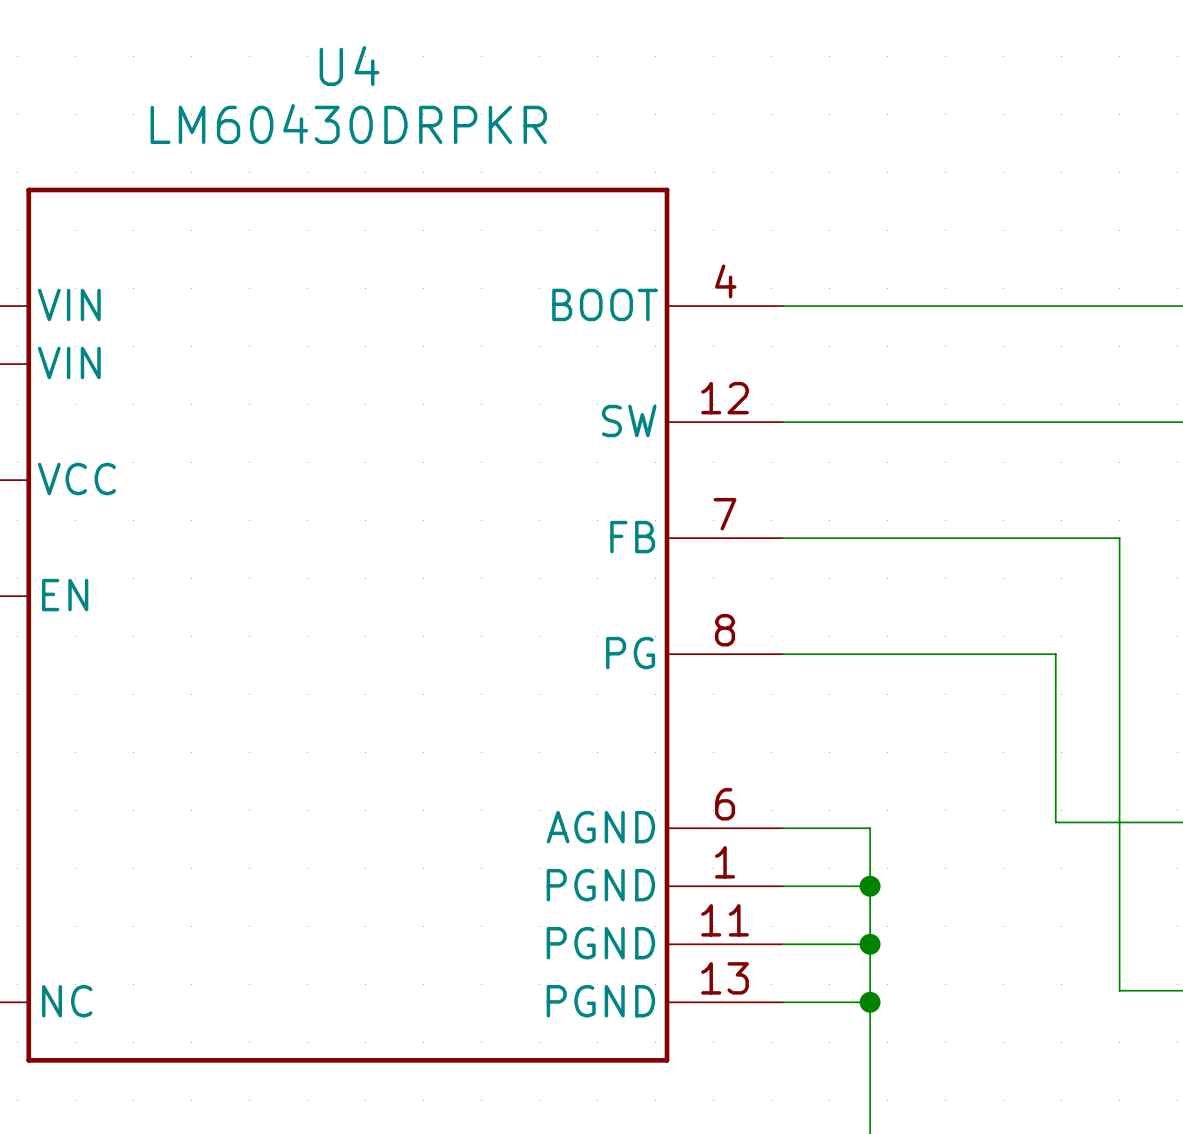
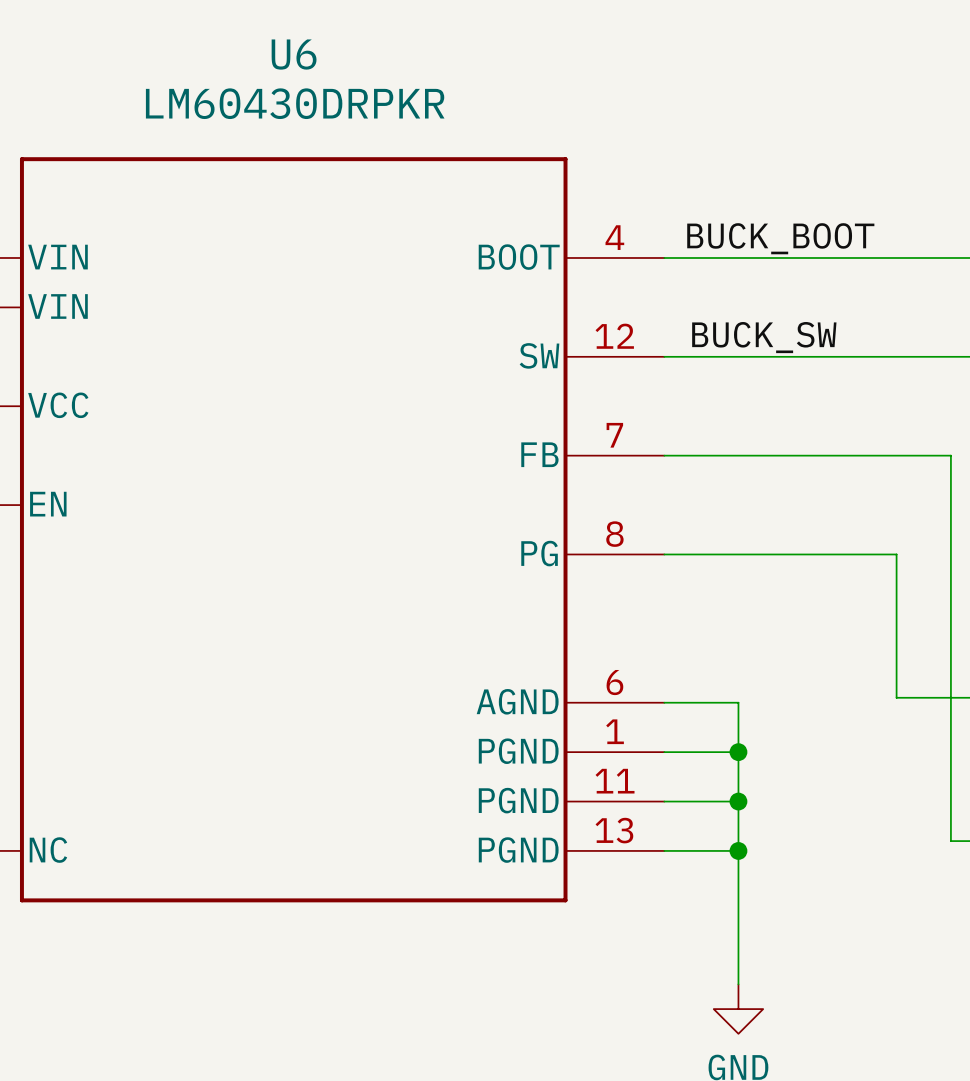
U4 name: U4 (349, 66) -> U6 (294, 54)
label: none -> BUCK_BOOT (780, 238)
label: none -> BUCK_SW (764, 337)

